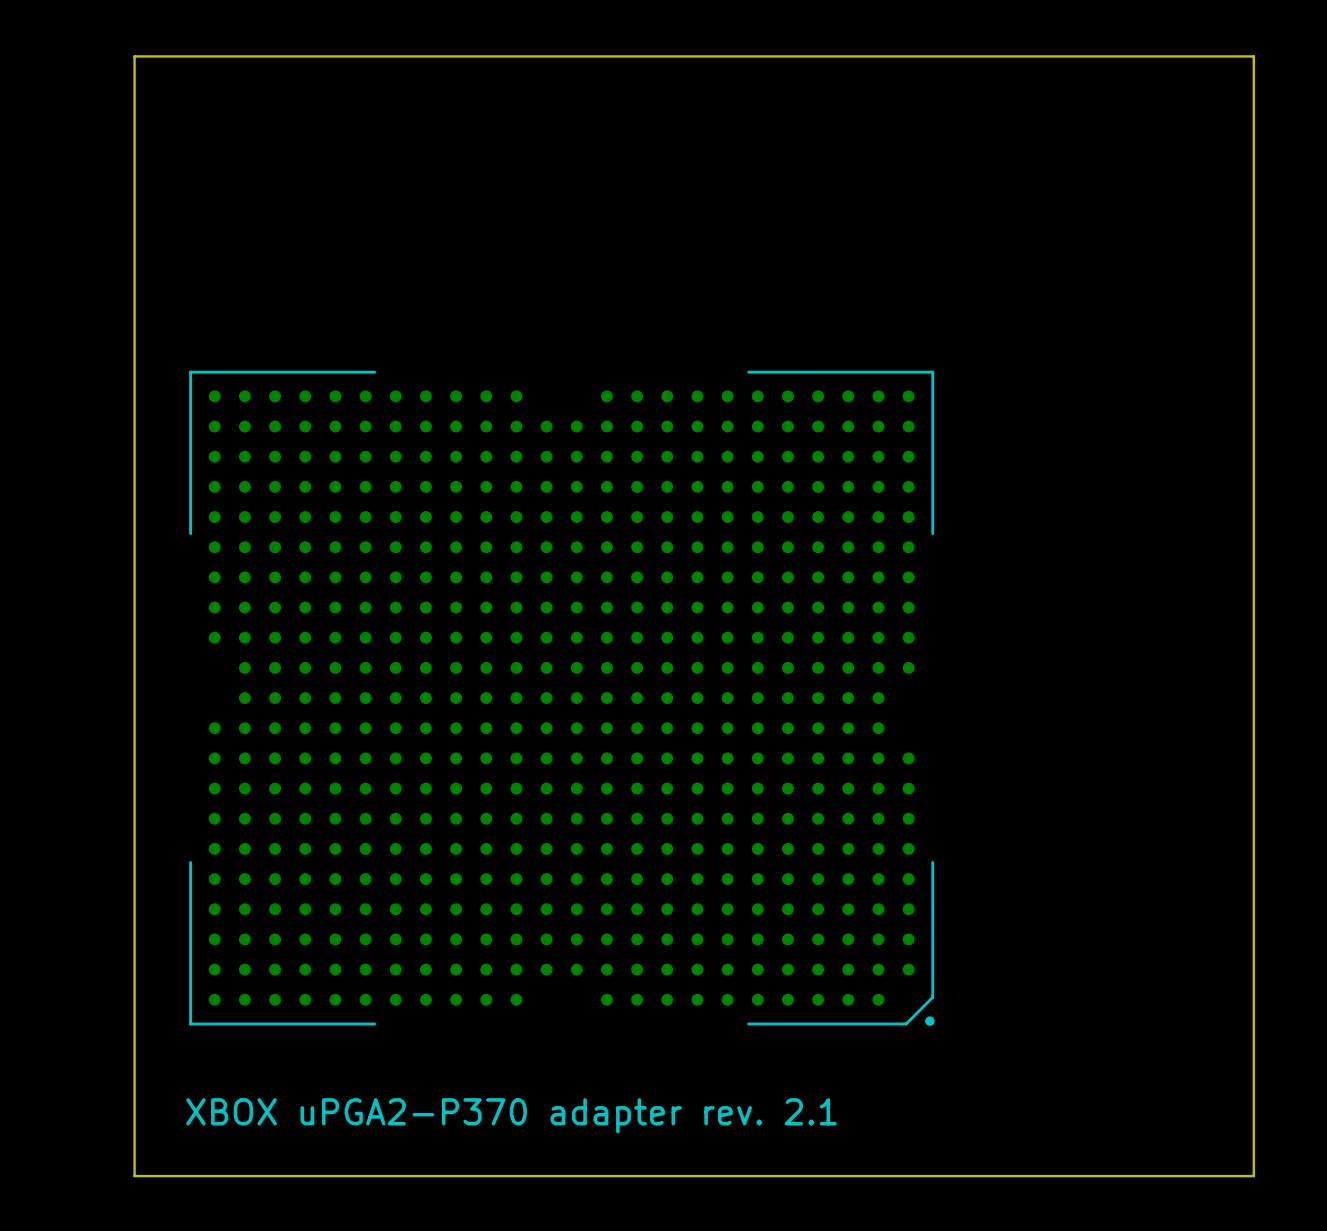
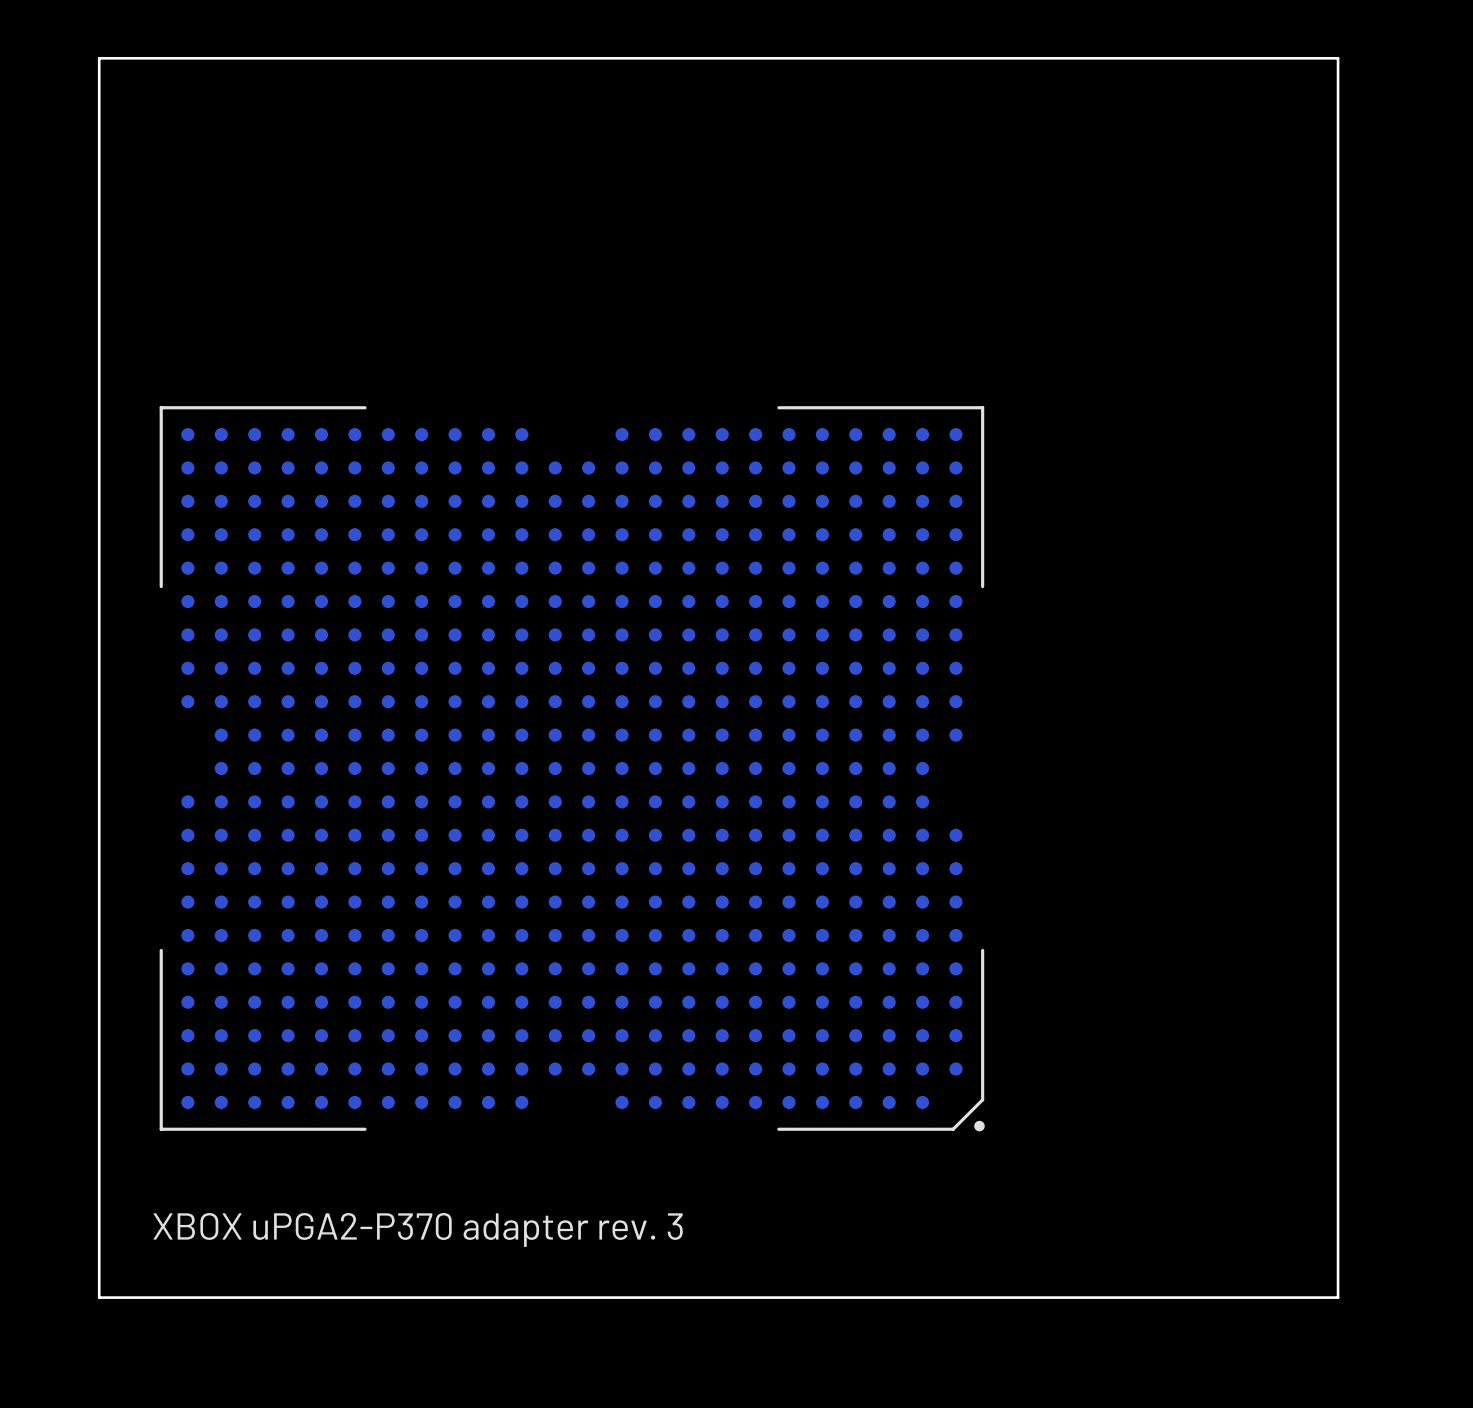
text: XBOX uPGA2-P370 adapter rev. 2.1 (511, 1115) -> XBOX uPGA2-P370 adapter rev. 3 (418, 1229)

